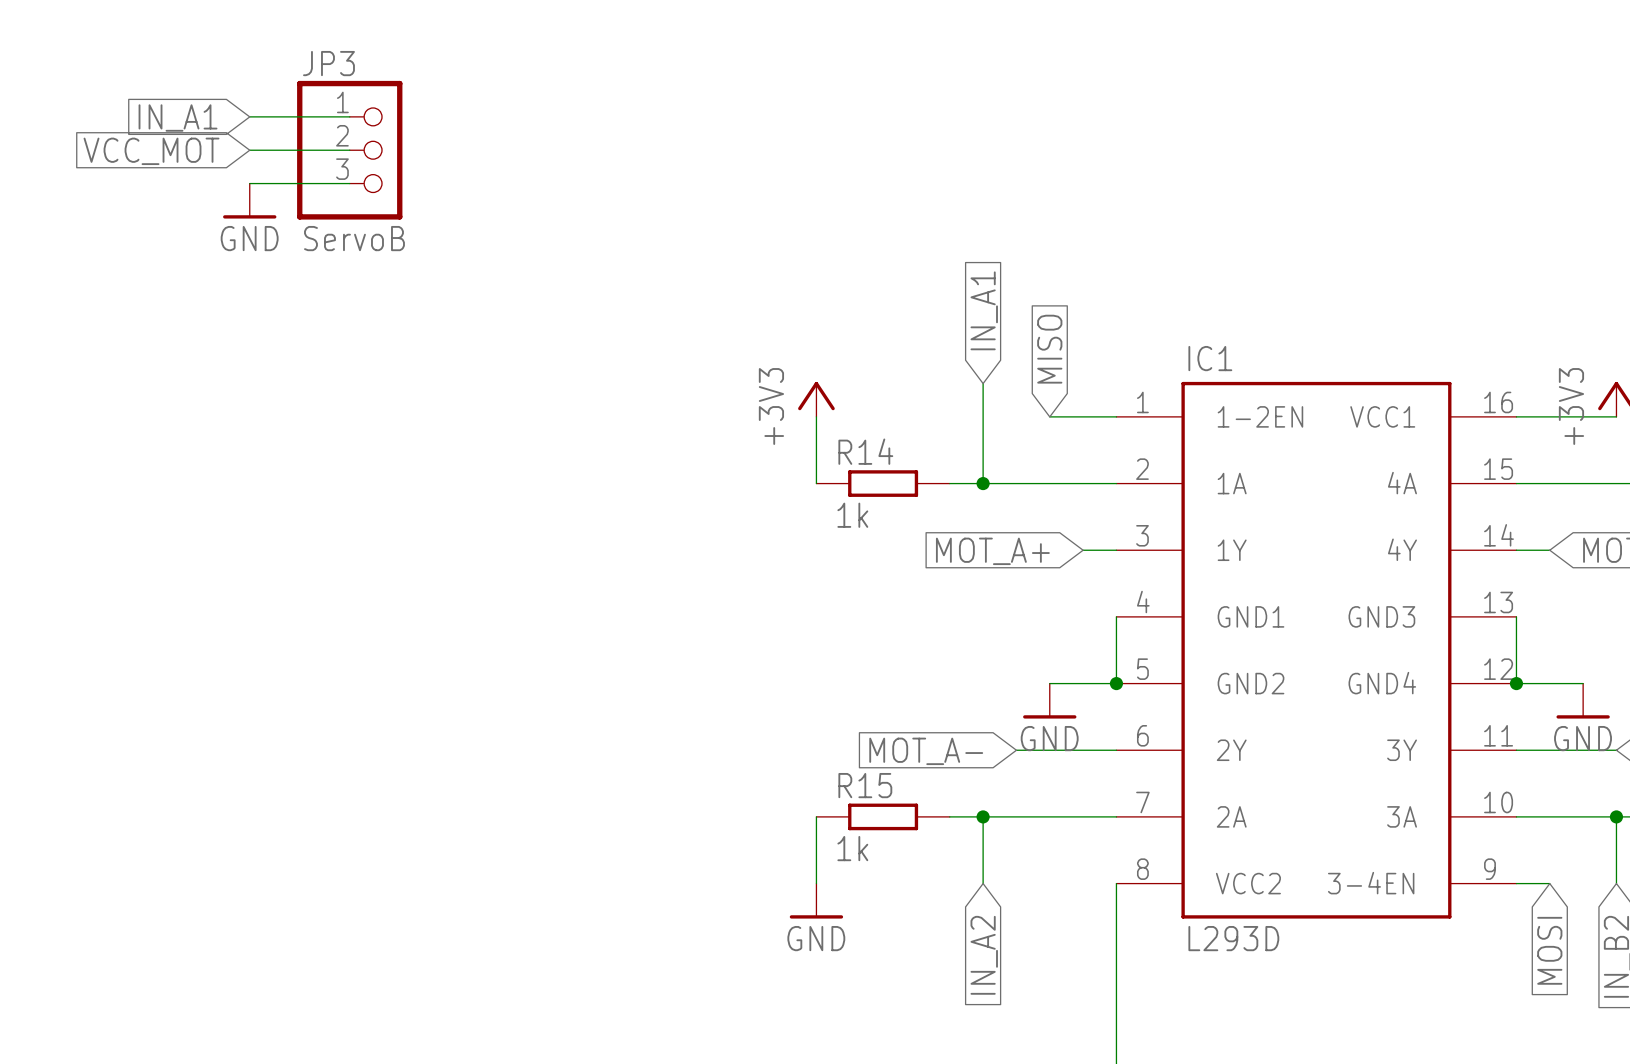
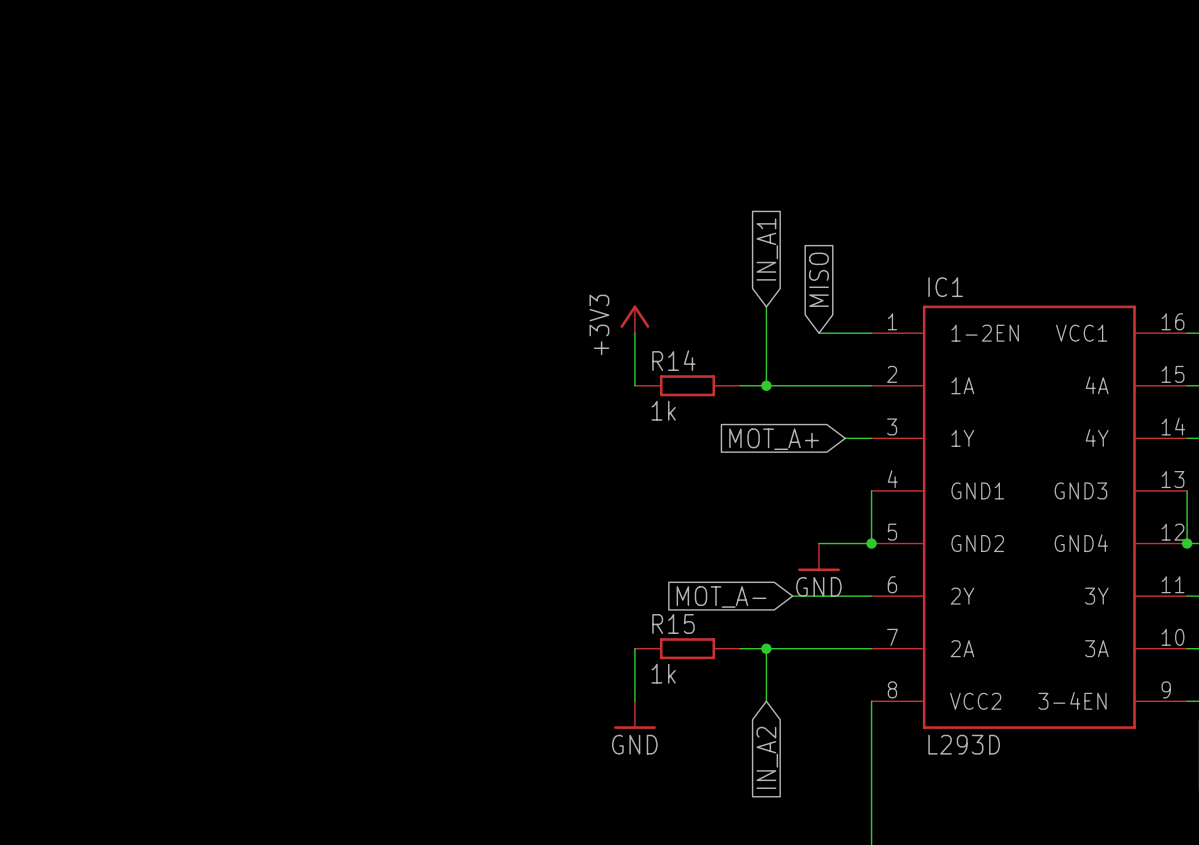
wire: (249, 116) (349, 116) -> none
global label: IN_A1 (178, 118) -> none
wire: (249, 150) (349, 150) -> none
JP3: ServoB (349, 150) -> none
global label: VCC_MOT (151, 151) -> none
wire: (249, 183) (349, 183) -> none
power symbol: GND (249, 201) -> none

